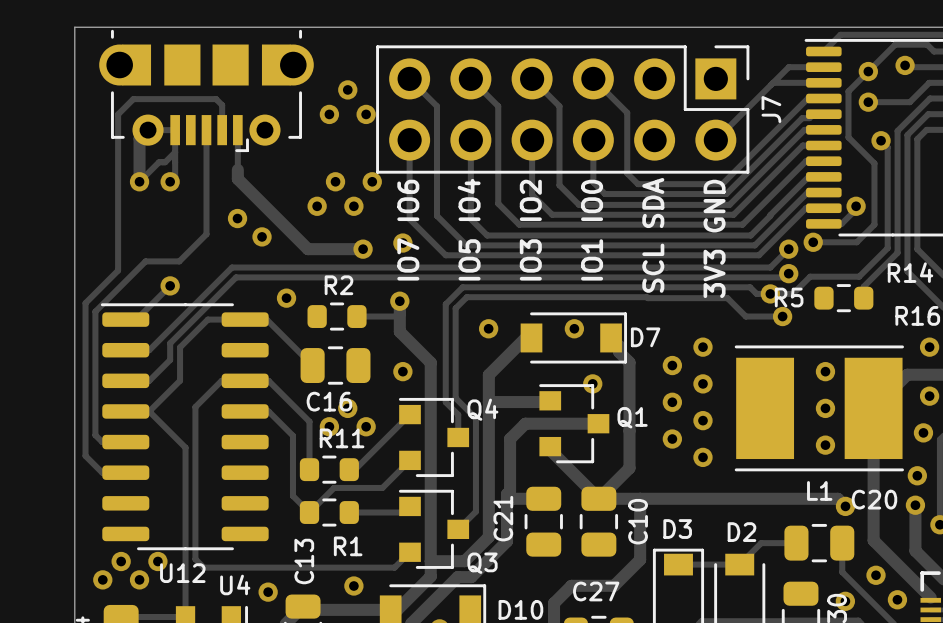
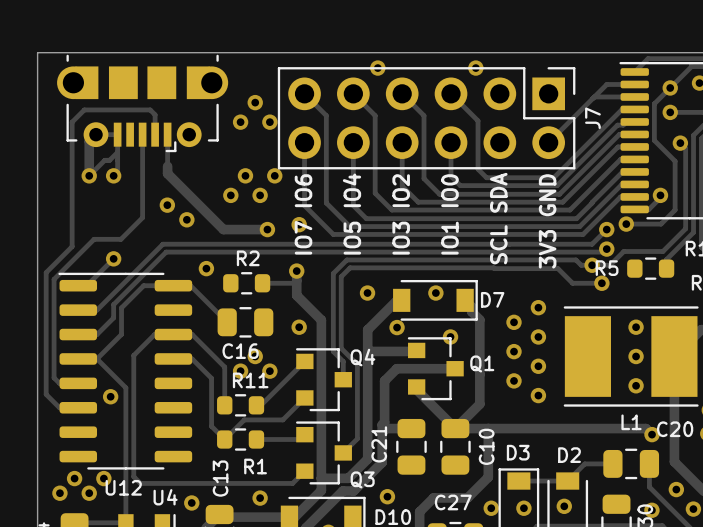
via: none -> (377, 68)
via: none -> (475, 68)
via: none -> (397, 327)
via: none -> (110, 396)
via: none -> (387, 496)
via: none -> (564, 506)
via: none -> (491, 508)
via: none -> (523, 508)

